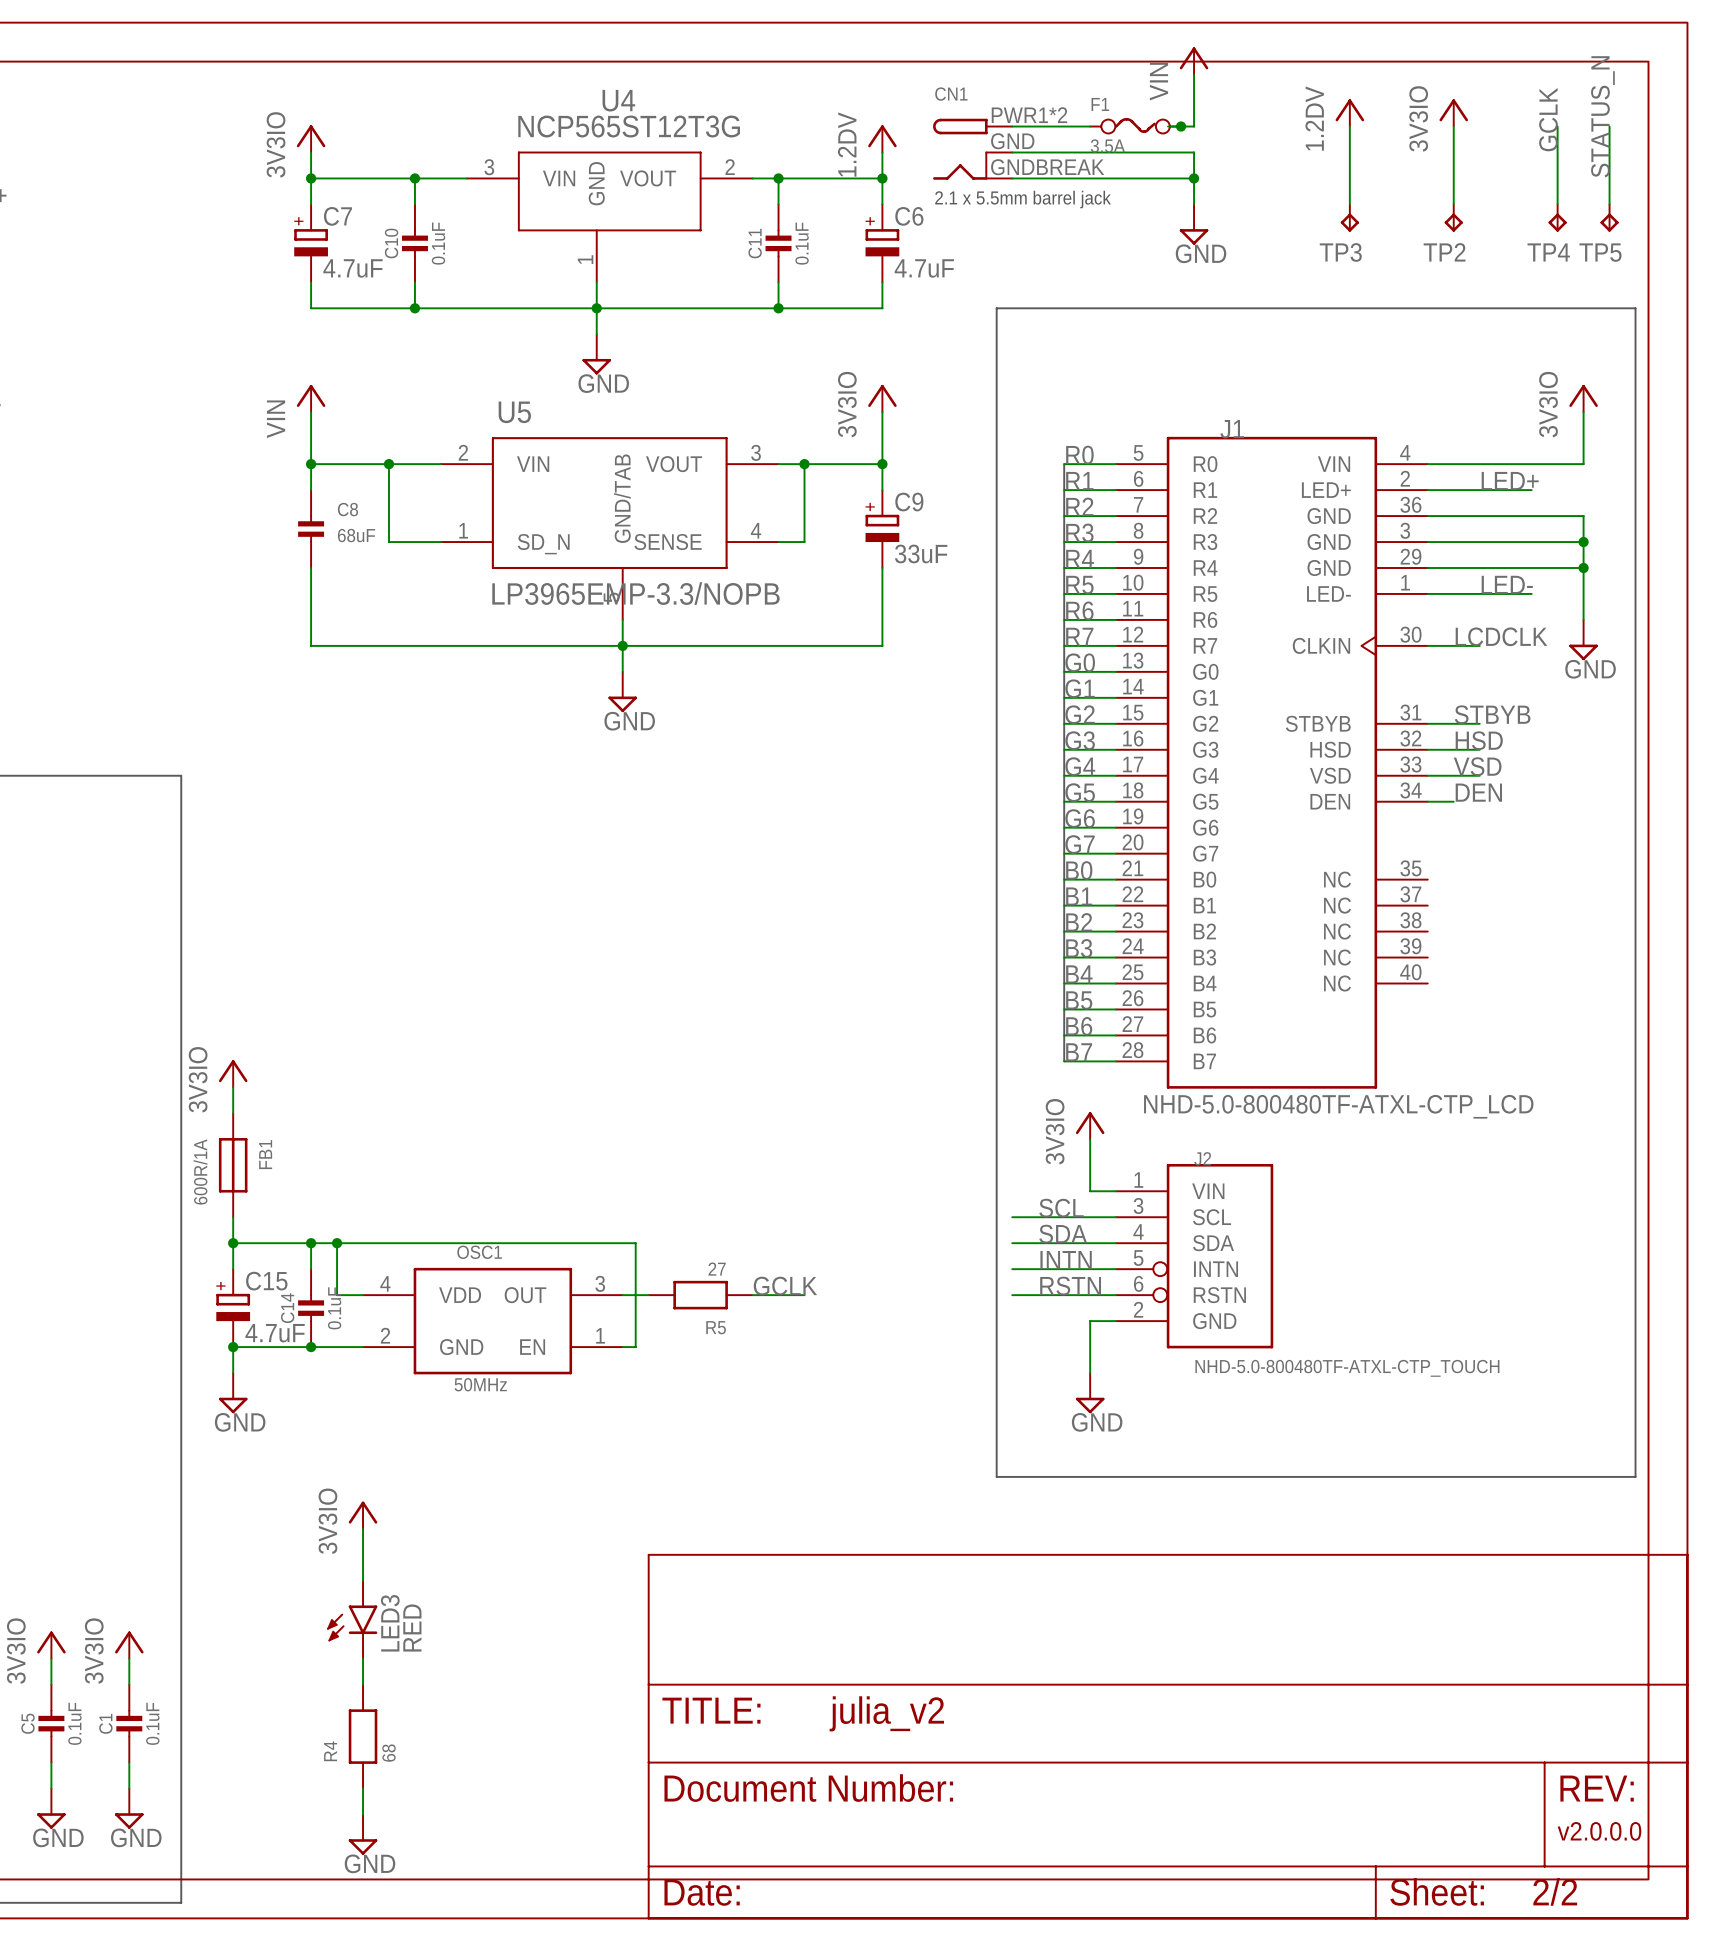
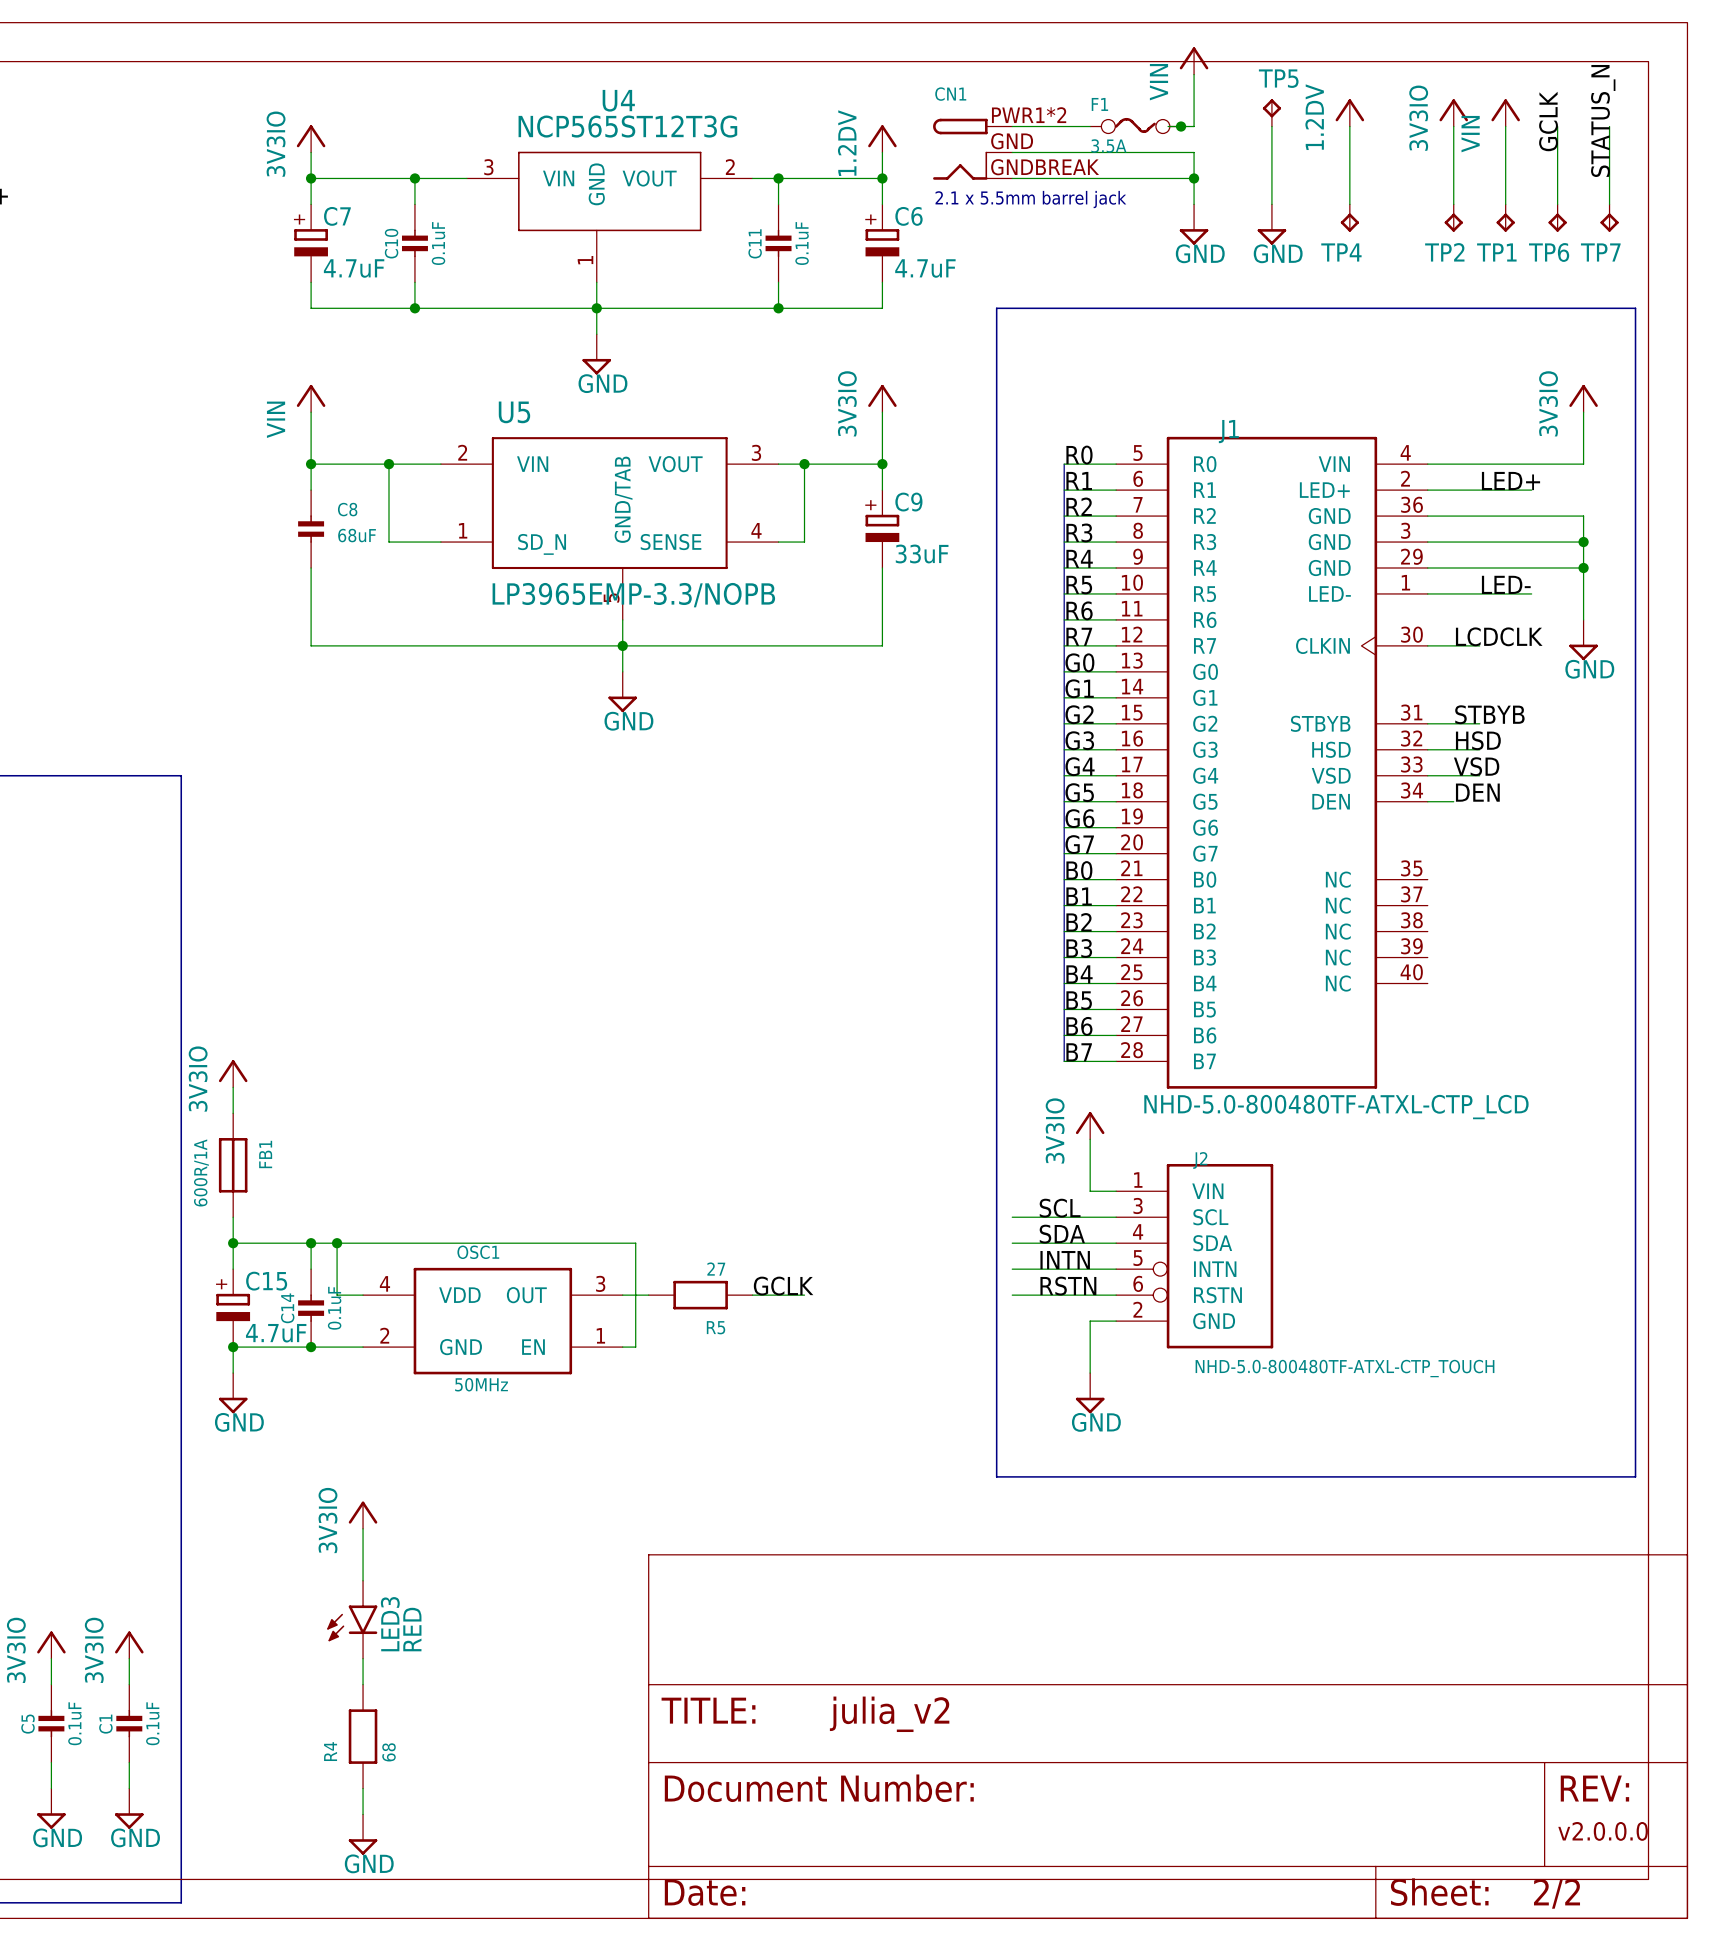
TP5: none -> (1271, 112)
power symbol: none -> VIN (1505, 112)
wire: none -> (1271, 126) (1271, 204)
wire: none -> (1505, 126) (1505, 204)
TP1: none -> (1505, 218)
power symbol: none -> GND (1271, 224)
TP3 name: TP3 (1340, 252) -> TP4 (1341, 252)
TP4 name: TP4 (1548, 252) -> TP6 (1549, 252)
TP5 name: TP5 (1600, 252) -> TP7 (1600, 252)

